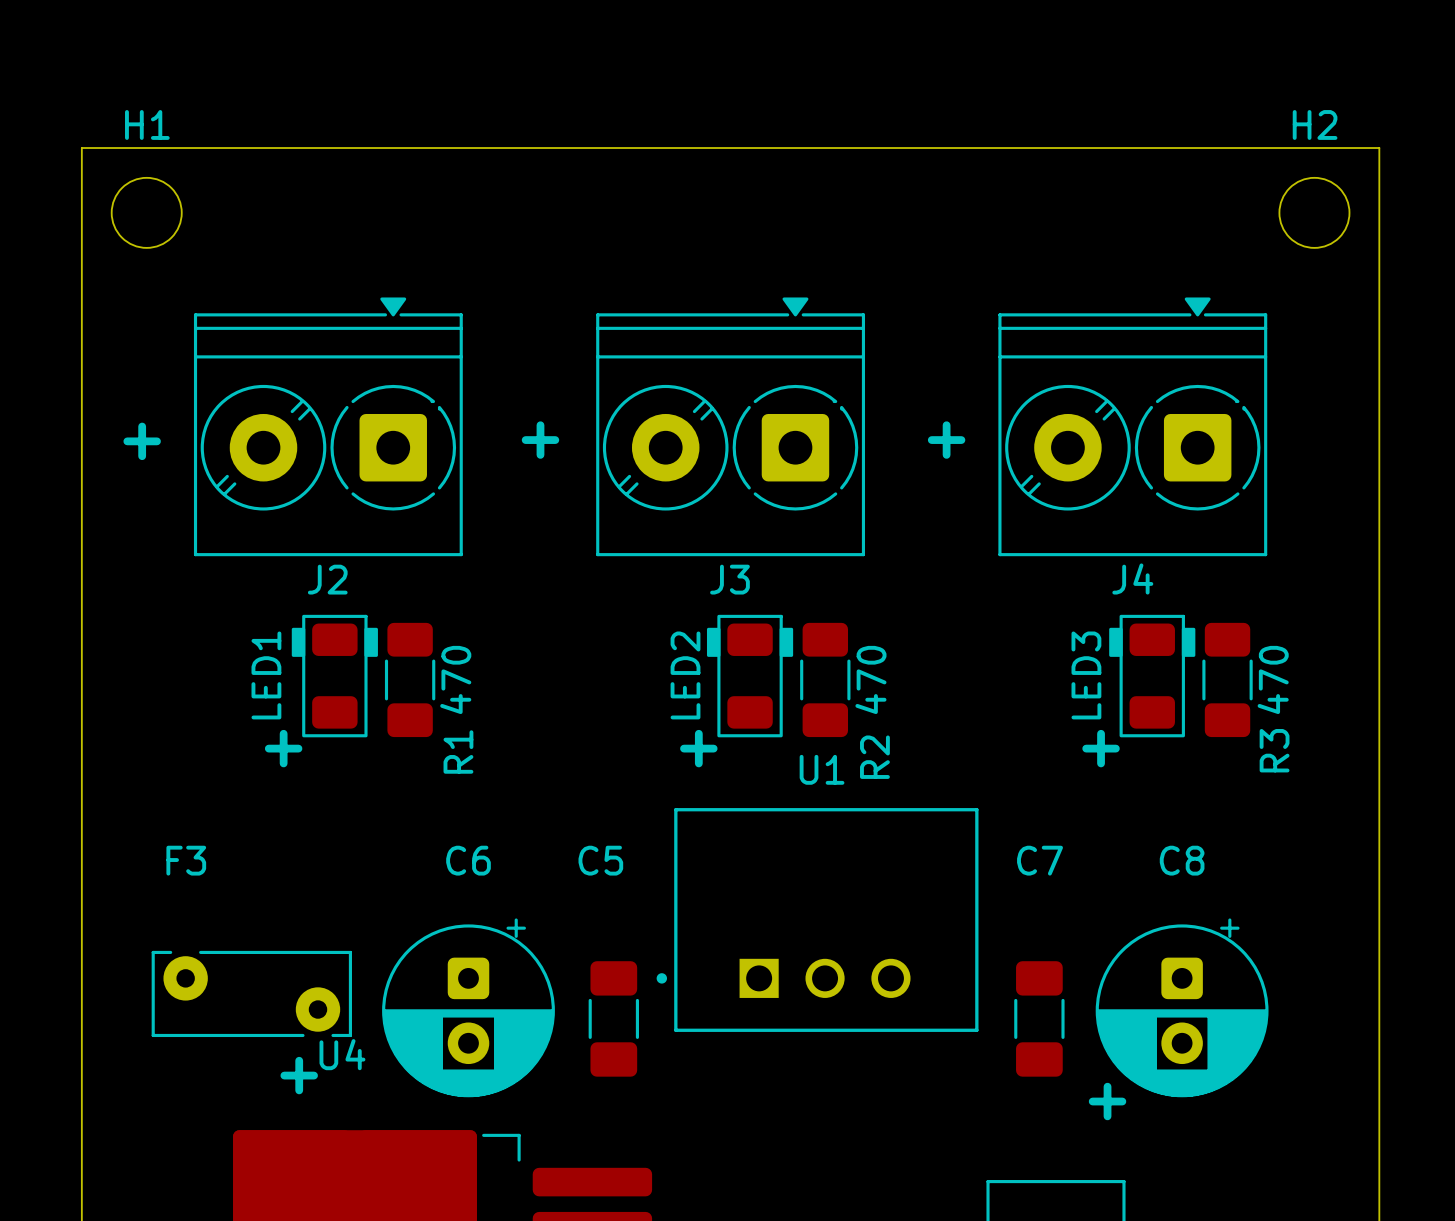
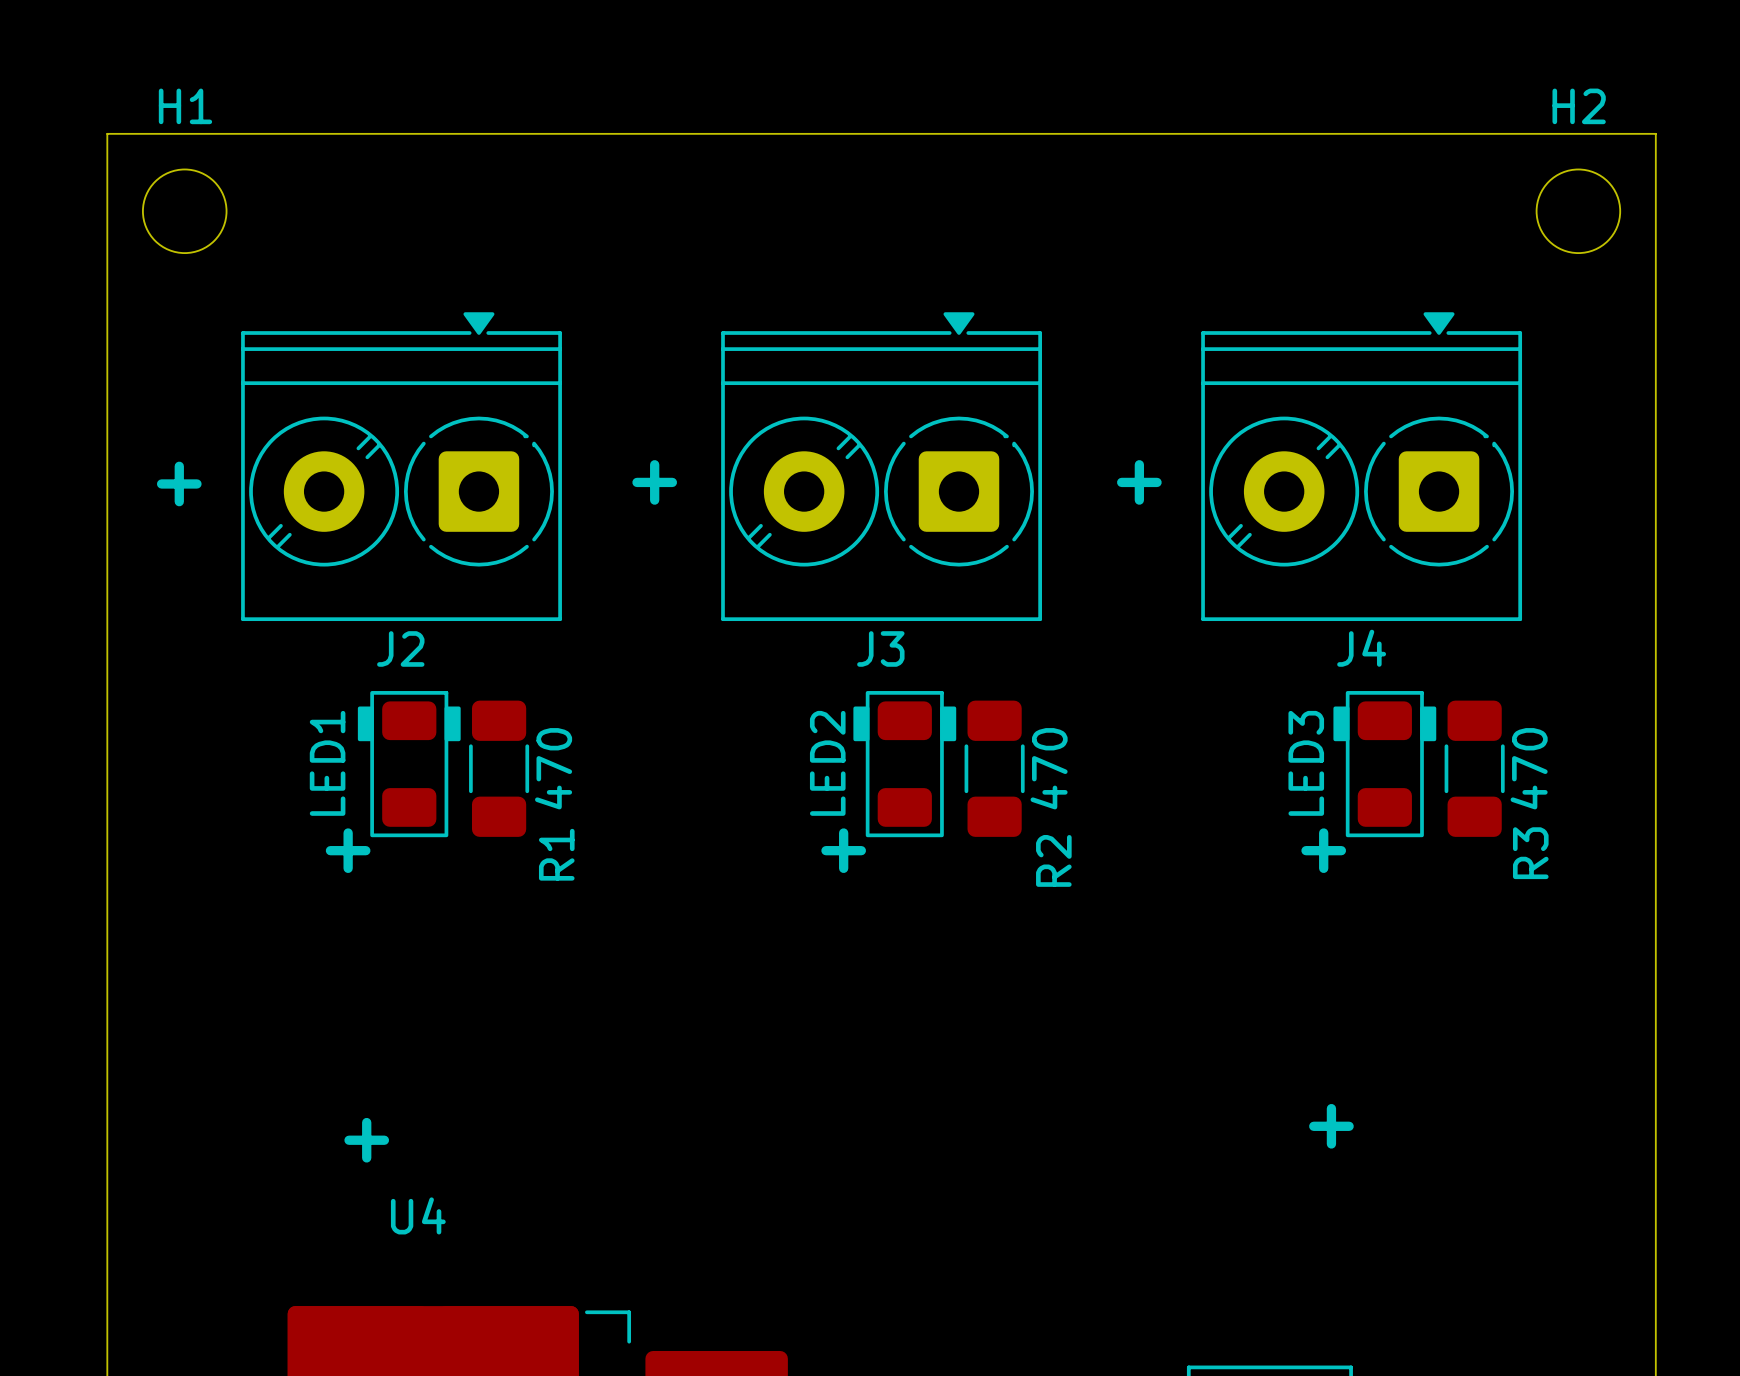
U1: (817, 920) -> none
F3: (251, 993) -> none
C6: (468, 1007) -> none
C8: (1182, 1007) -> none
C5: (613, 1018) -> none
C7: (1039, 1018) -> none
text position: + (299, 1075) -> + (366, 1140)
text position: + (1107, 1101) -> + (1331, 1126)

